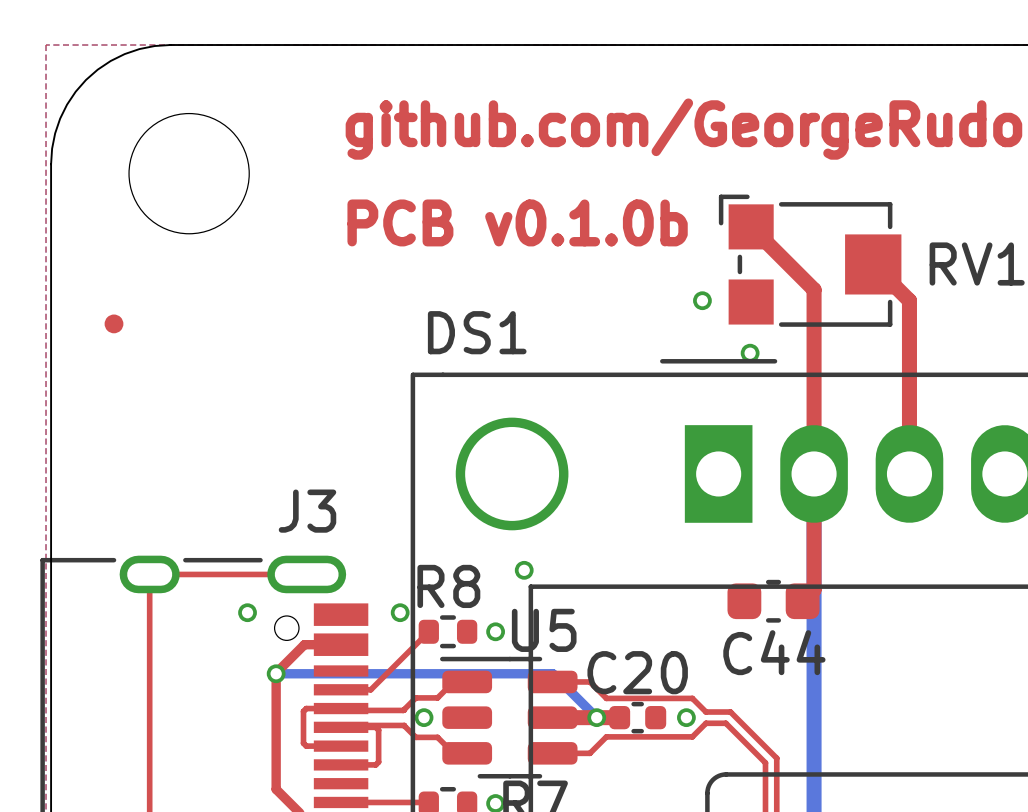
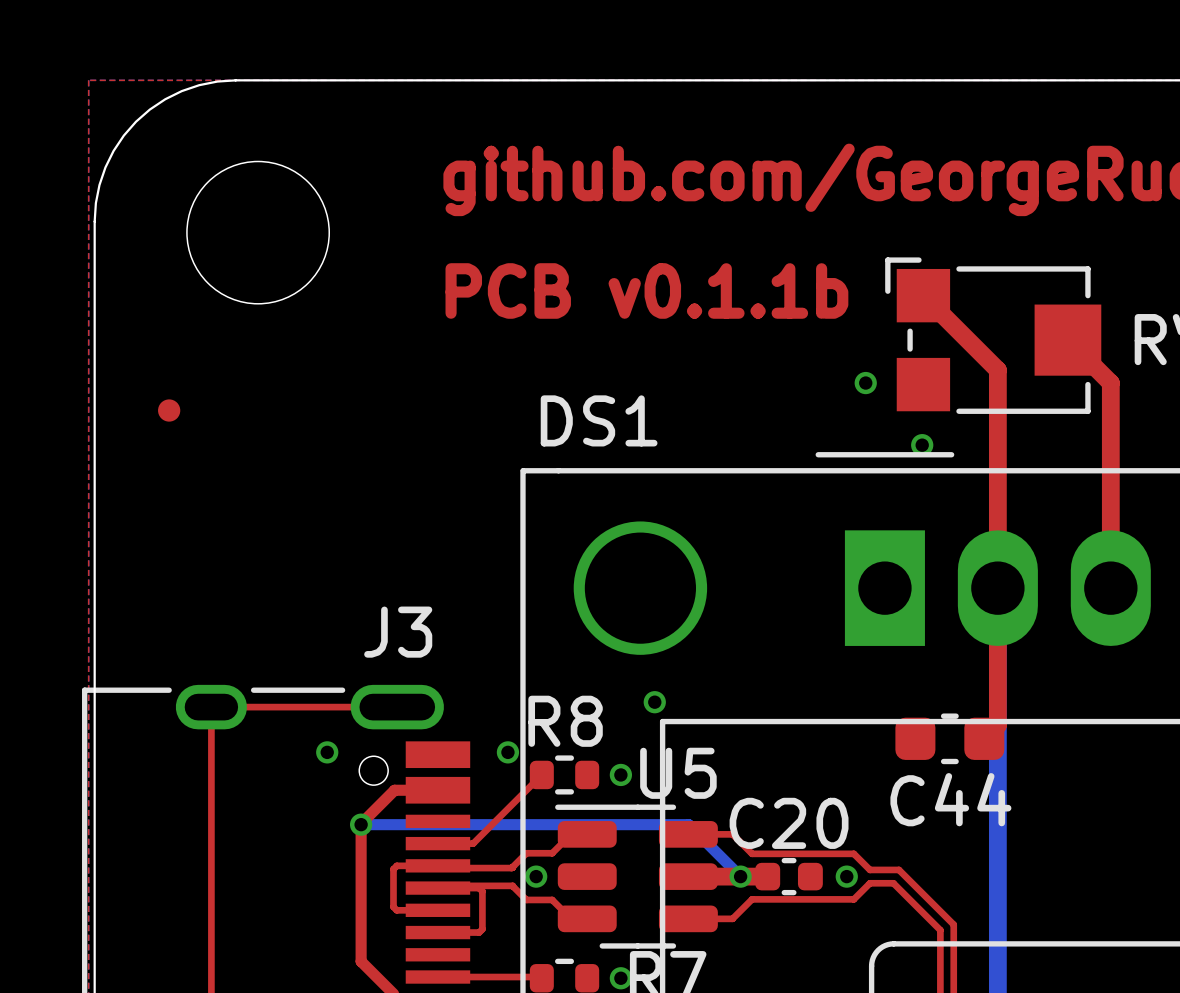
text: PCB v0.1.0b (517, 222) -> PCB v0.1.1b (646, 290)

